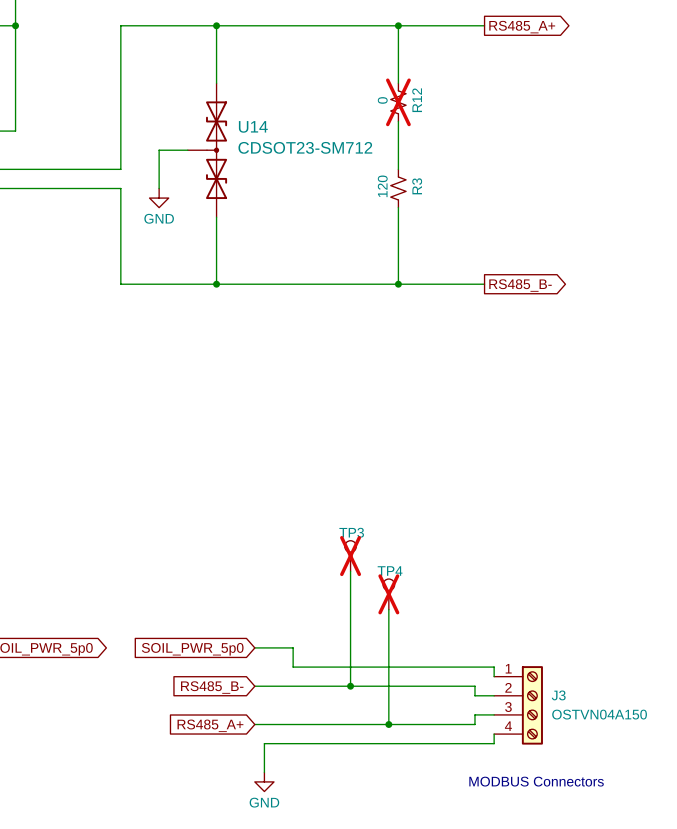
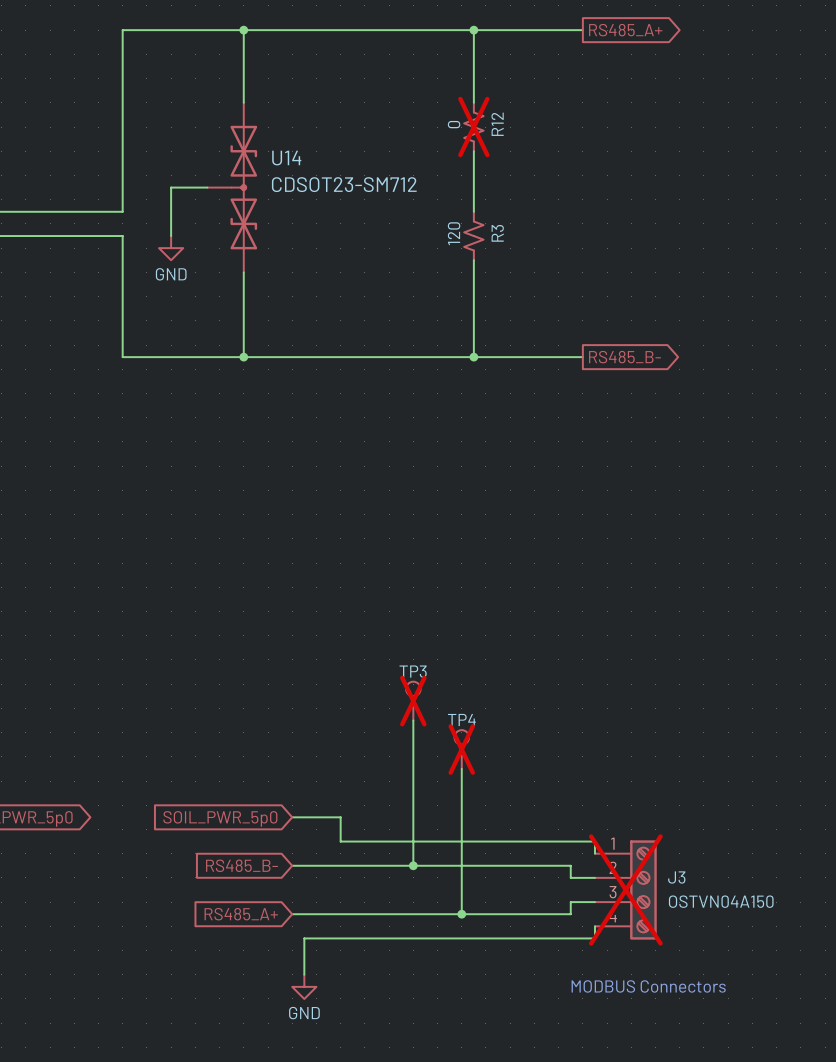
J3 do-not-place cross: none -> (625, 889)

